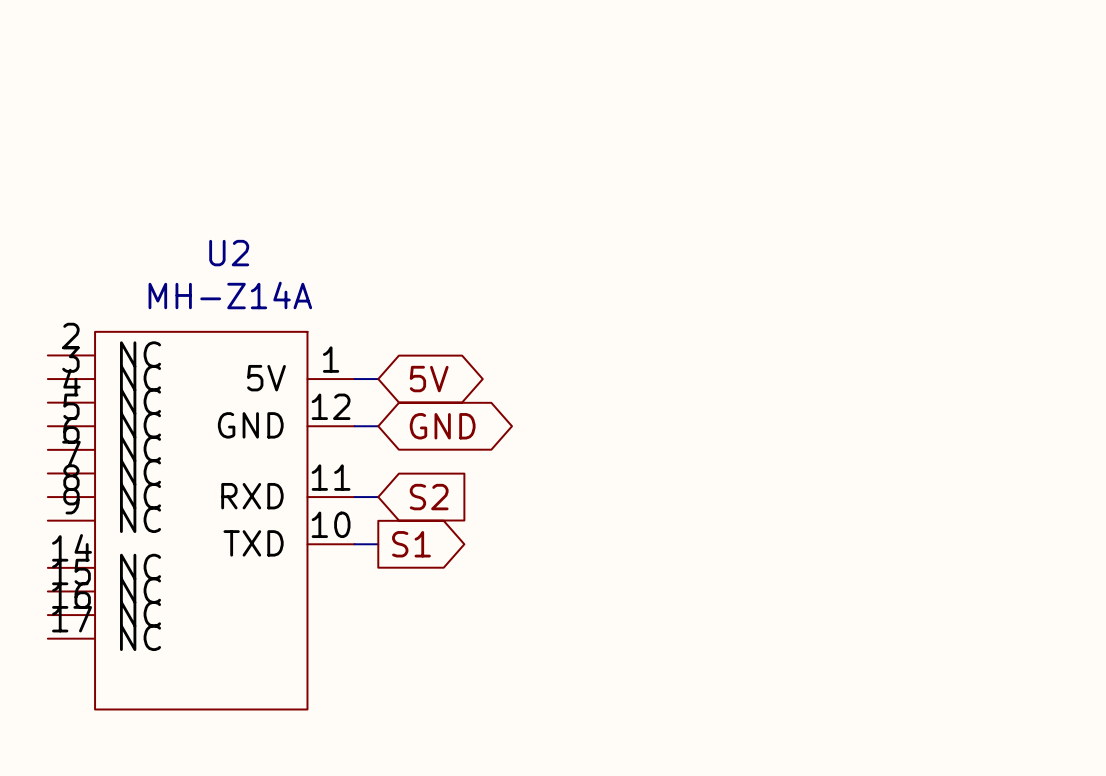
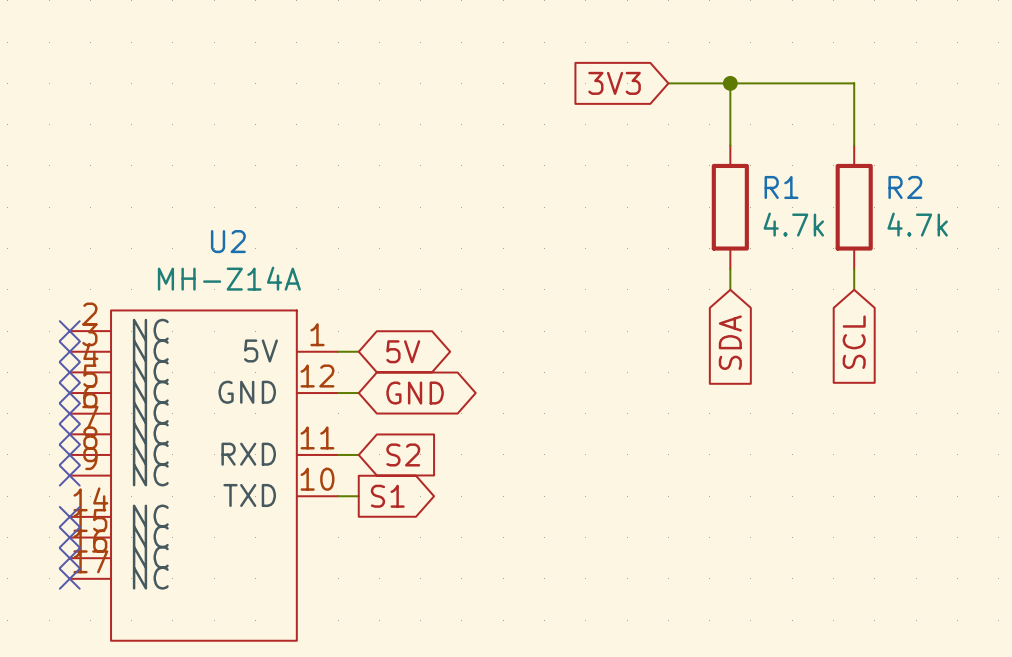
global label: none -> 3V3 (614, 83)
wire: none -> (668, 83) (854, 83) (854, 145)
wire: none -> (730, 83) (730, 145)
junction: none -> (730, 83)
R1: none -> 4.7k (730, 207)
R2: none -> 4.7k (854, 207)
wire: none -> (730, 269) (730, 289)
wire: none -> (854, 269) (854, 289)
no-connect mark: none -> (69, 331)
global label: none -> SDA (730, 342)
global label: none -> SCL (854, 342)
no-connect mark: none -> (69, 351)
no-connect mark: none -> (69, 372)
no-connect mark: none -> (69, 393)
no-connect mark: none -> (69, 413)
no-connect mark: none -> (69, 434)
no-connect mark: none -> (69, 454)
no-connect mark: none -> (69, 475)
no-connect mark: none -> (69, 516)
no-connect mark: none -> (69, 537)
no-connect mark: none -> (69, 558)
no-connect mark: none -> (69, 578)

